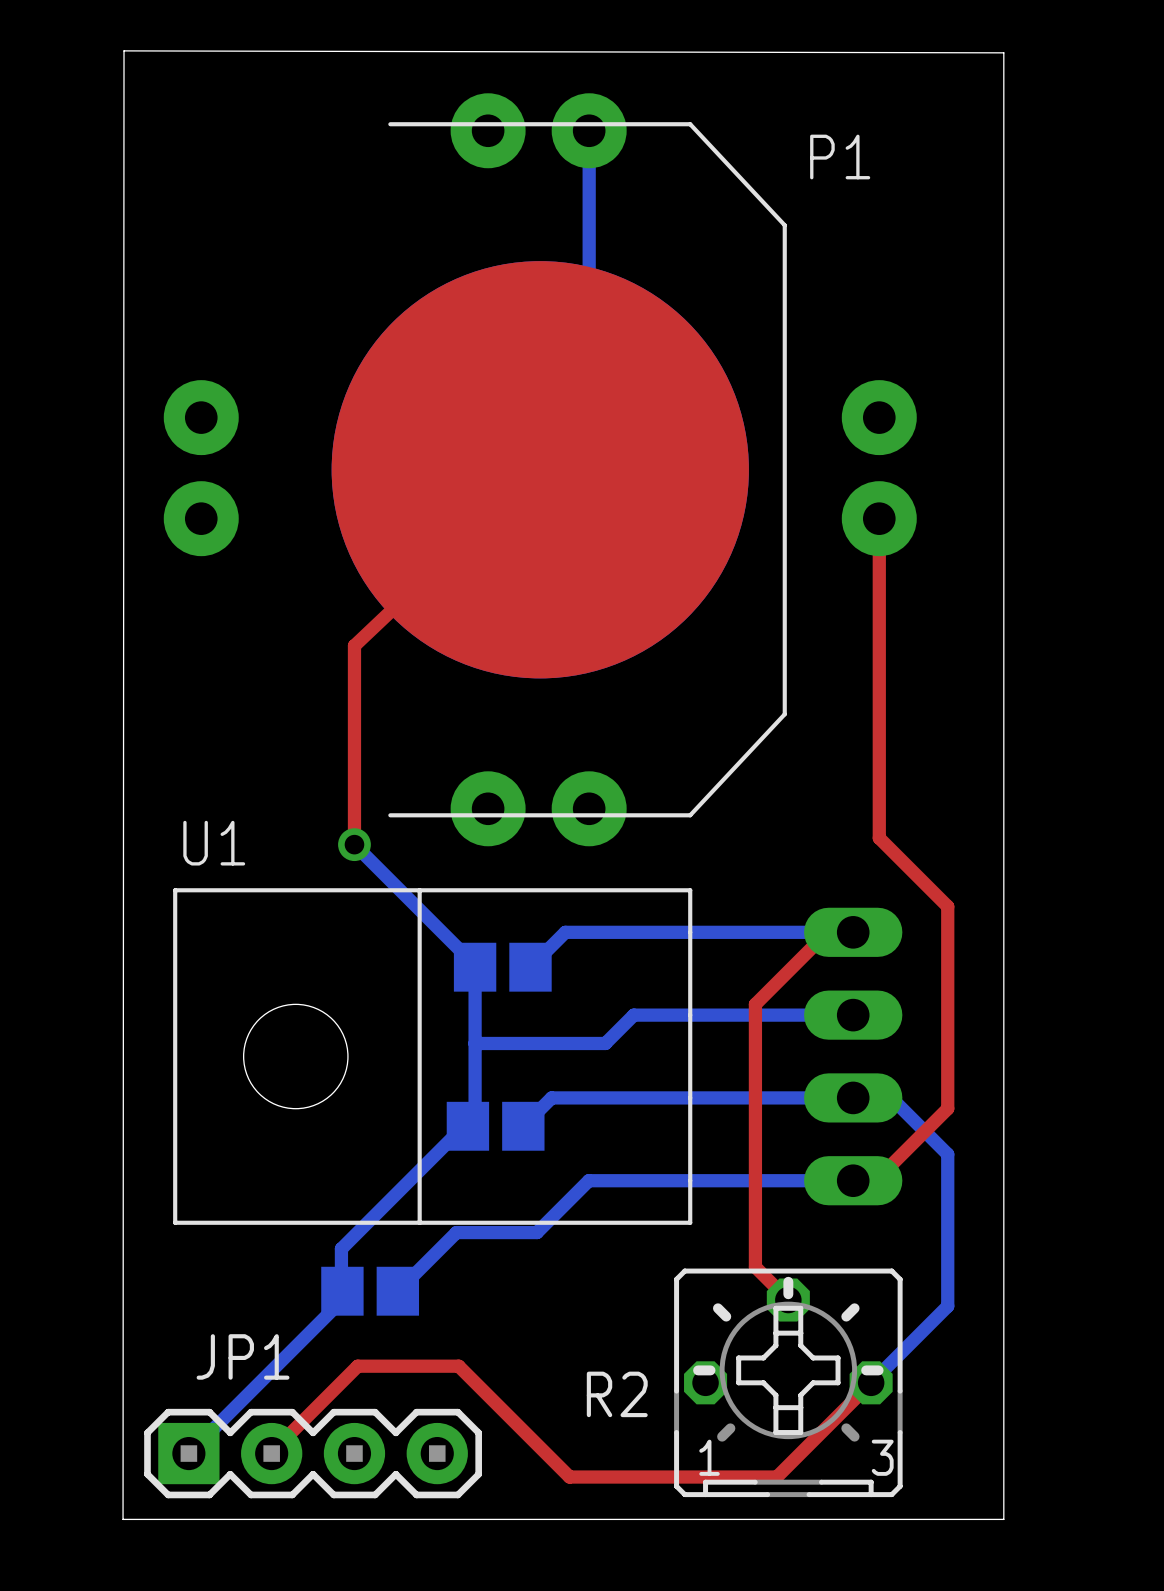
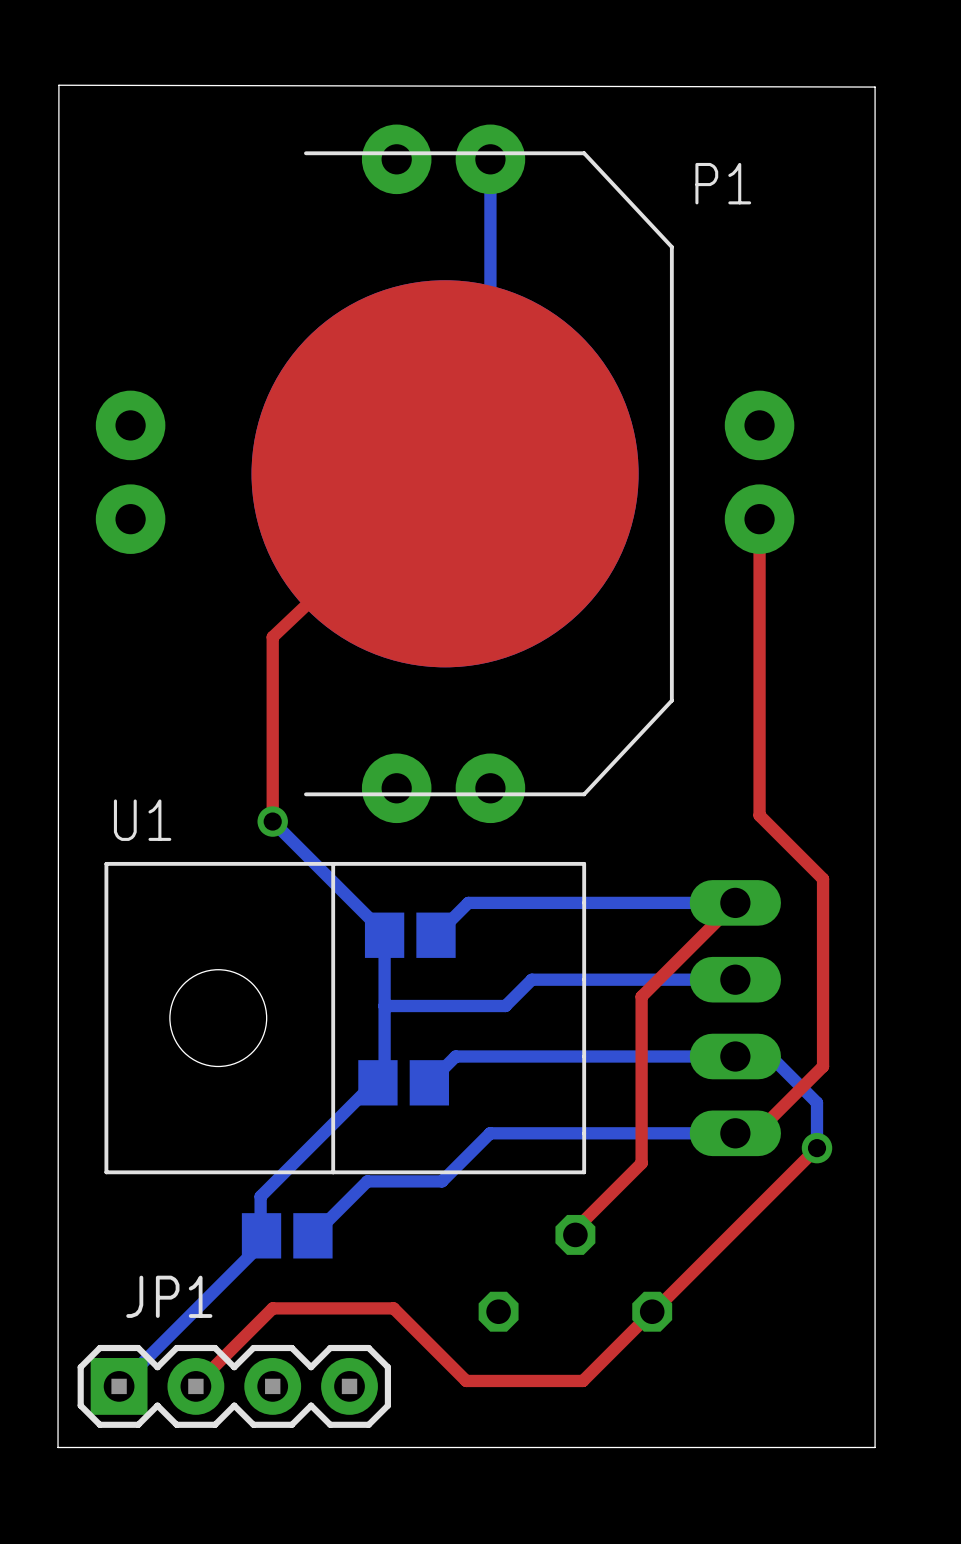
top track: (853, 932) (827, 932) (755, 1004) (755, 1267) (788, 1300) -> (735, 902) (641, 996) (641, 1163) (575, 1229) (575, 1234)
bottom track: (941, 1147) (947, 1154) (947, 1306) (871, 1382) -> (817, 1102) (817, 1148)
via: none -> (817, 1148)
top track: (354, 1369) (357, 1366) (458, 1366) (569, 1477) (776, 1477) (871, 1382) -> (272, 1308) (393, 1308) (466, 1380) (582, 1380) (817, 1148)
R2 side: top (788, 1382) -> bottom (575, 1273)

